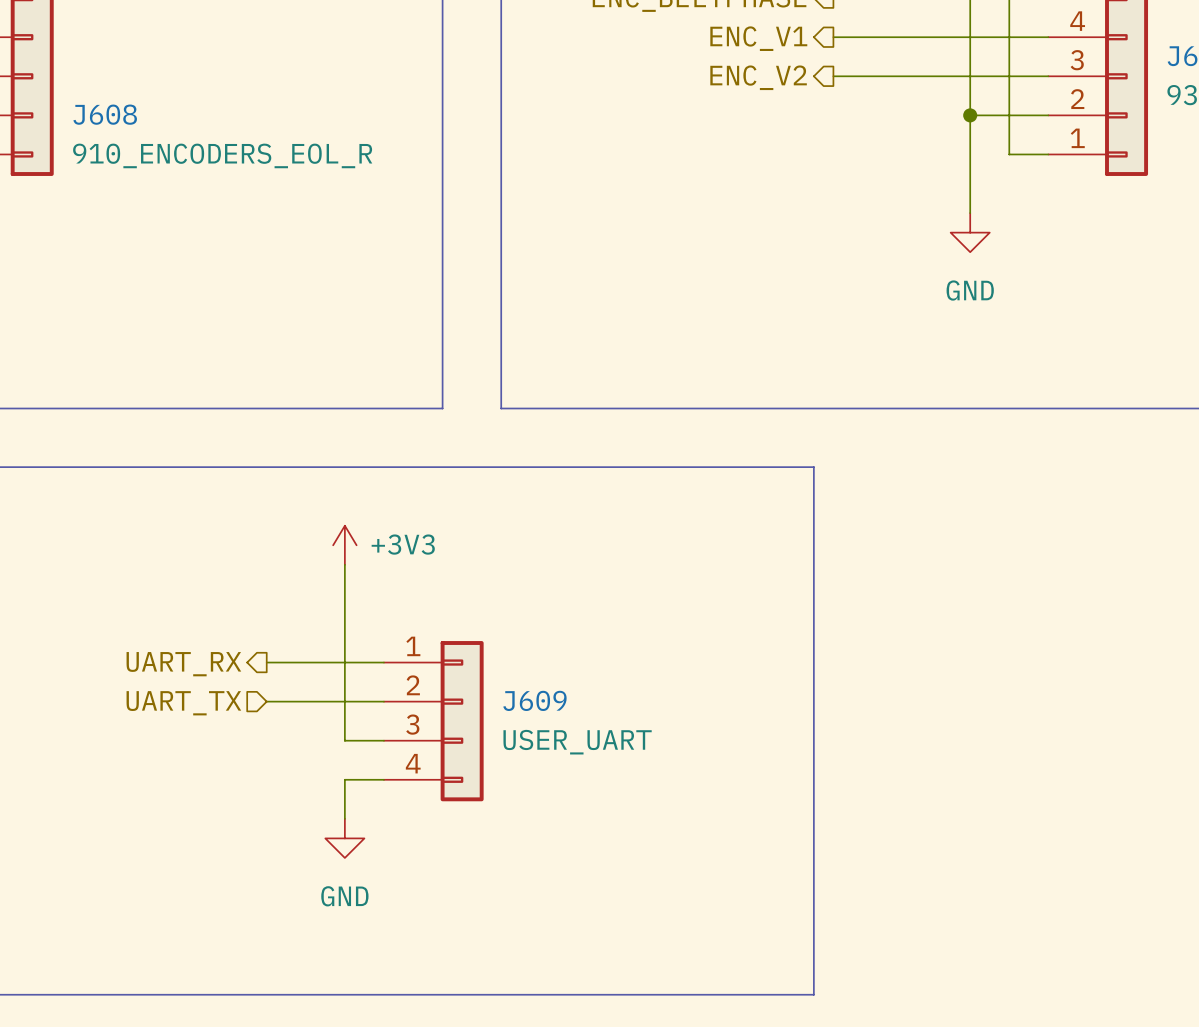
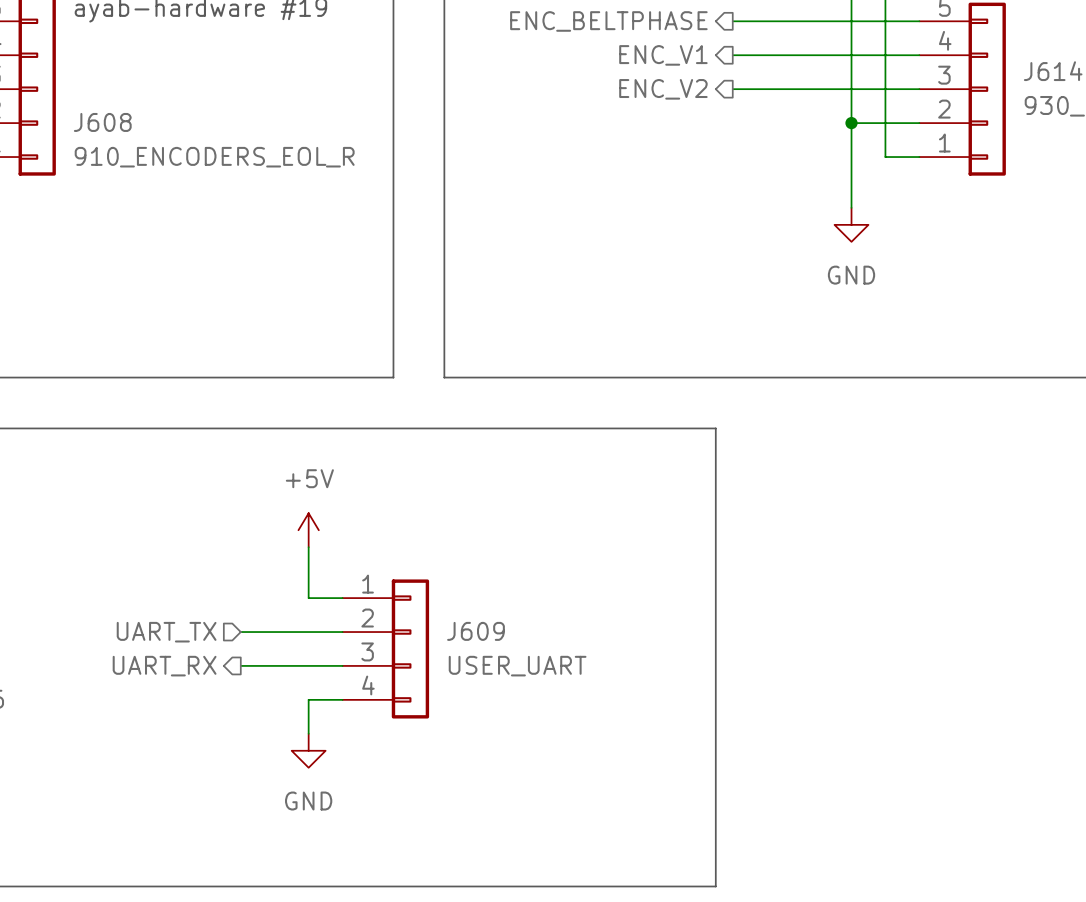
power symbol: +3V3 (344, 545) -> none
power symbol: none -> +5V (308, 530)
wire: (266, 662) (344, 662) (344, 740) -> (240, 665) (308, 665)
hierarchical label position: UART_RX (183, 664) -> UART_RX (164, 666)

